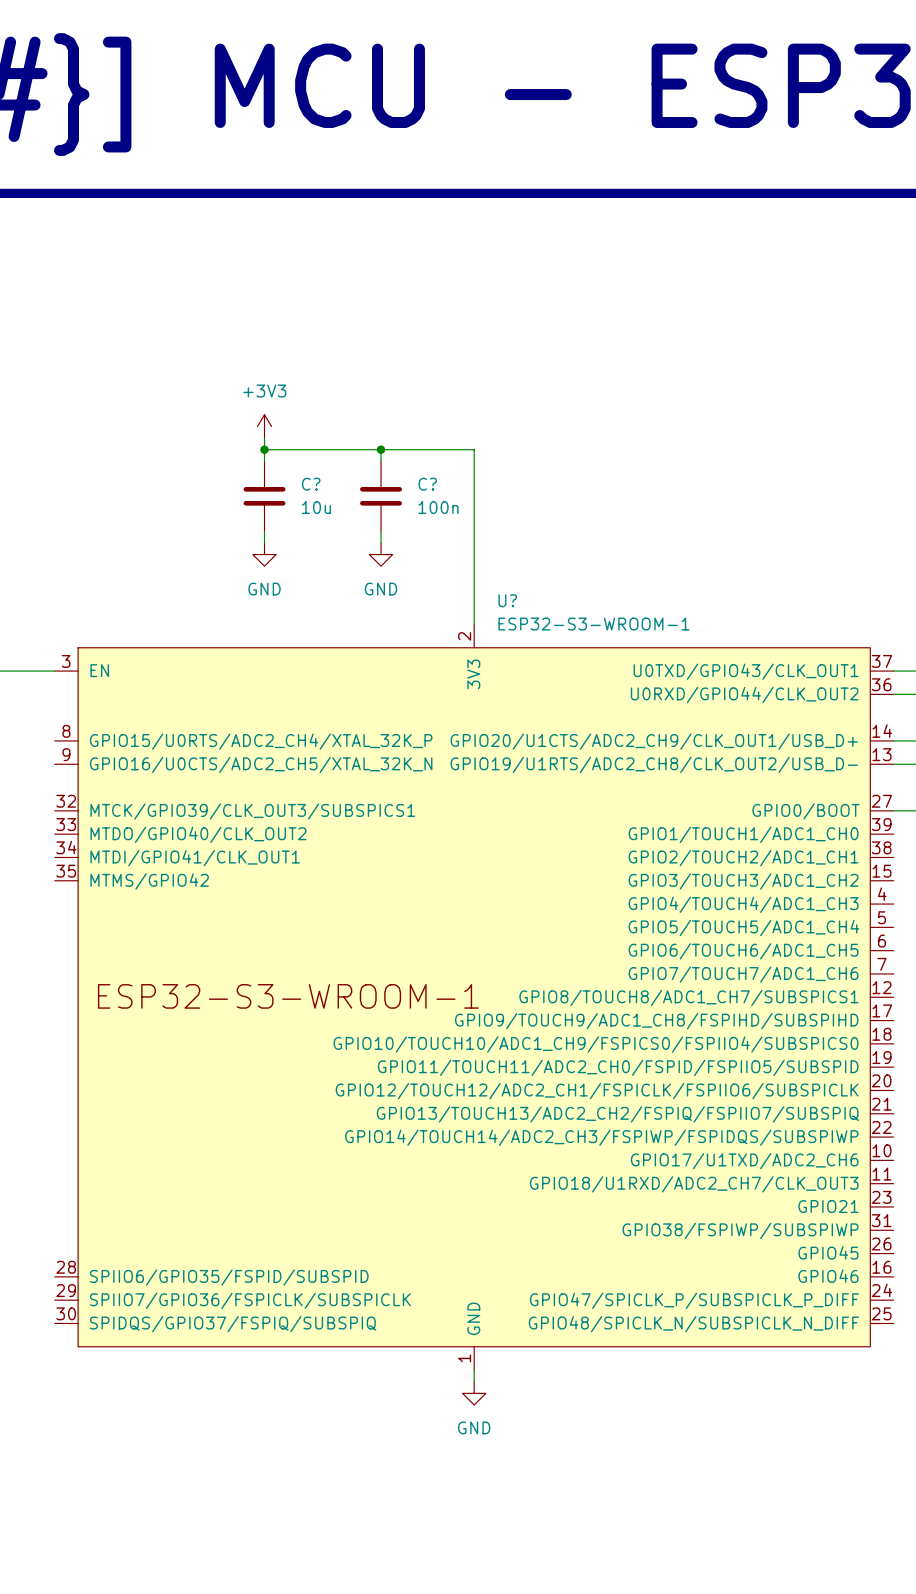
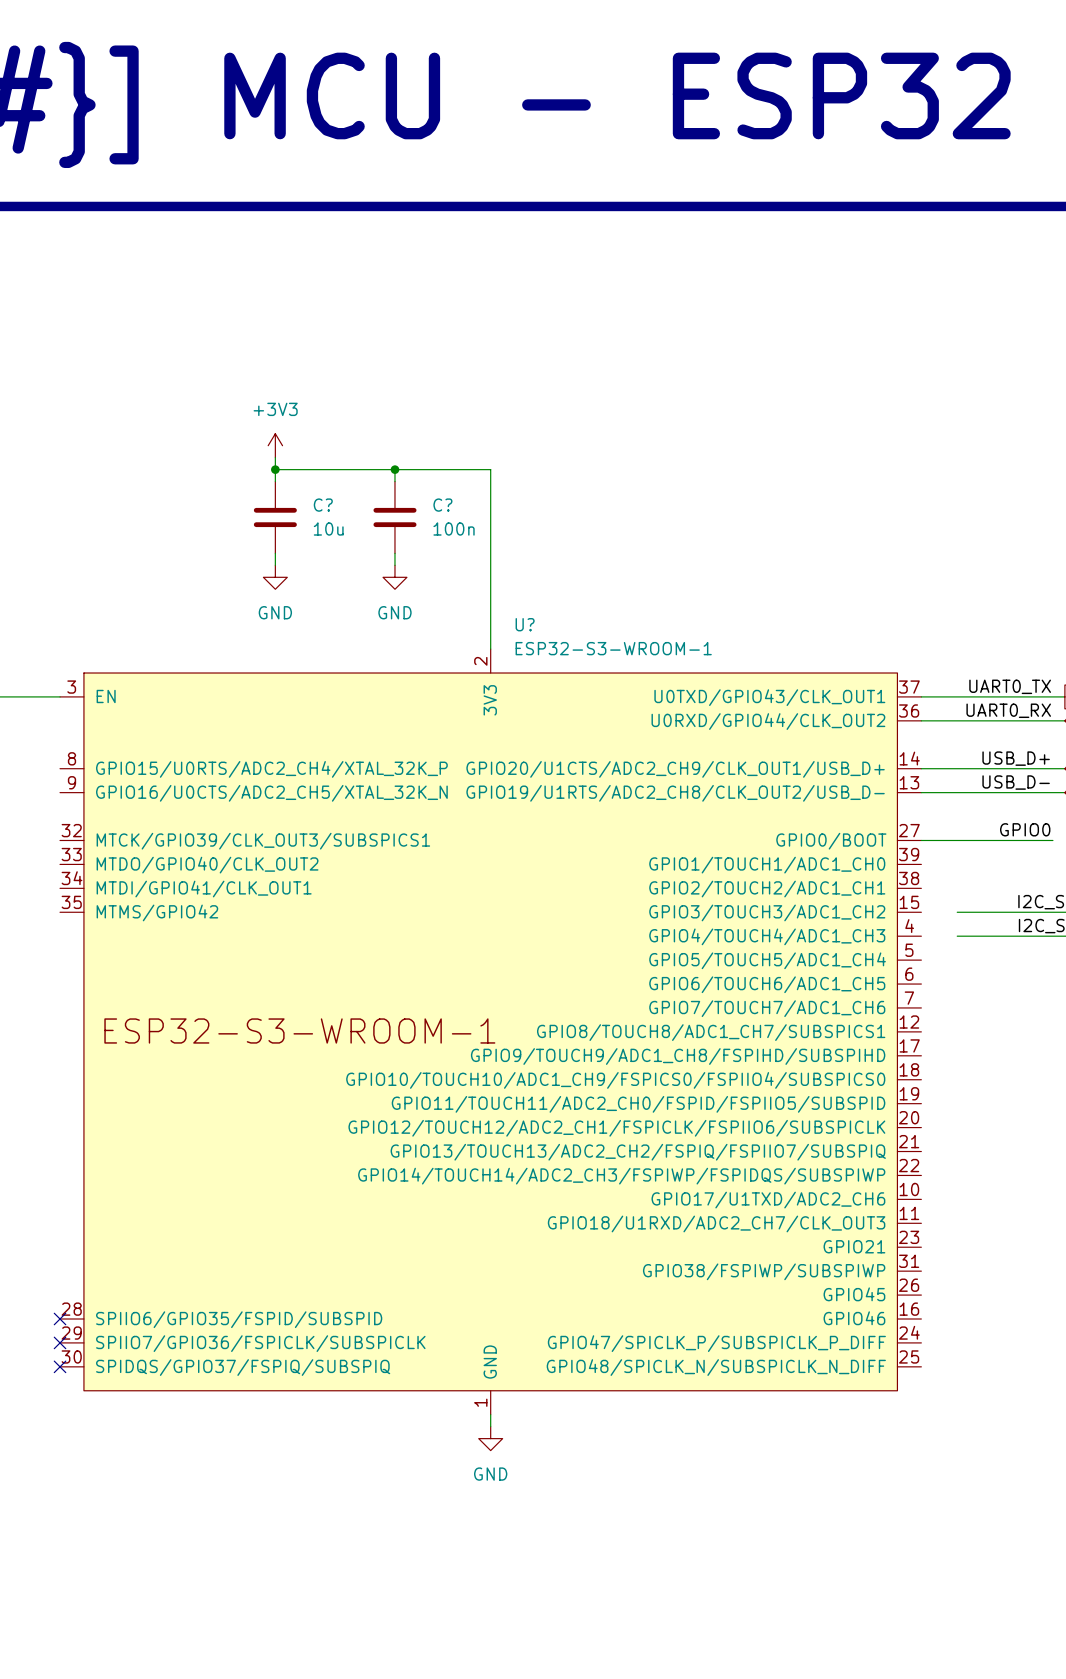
no-connect mark: none -> (60, 1319)
no-connect mark: none -> (60, 1342)
no-connect mark: none -> (60, 1366)

